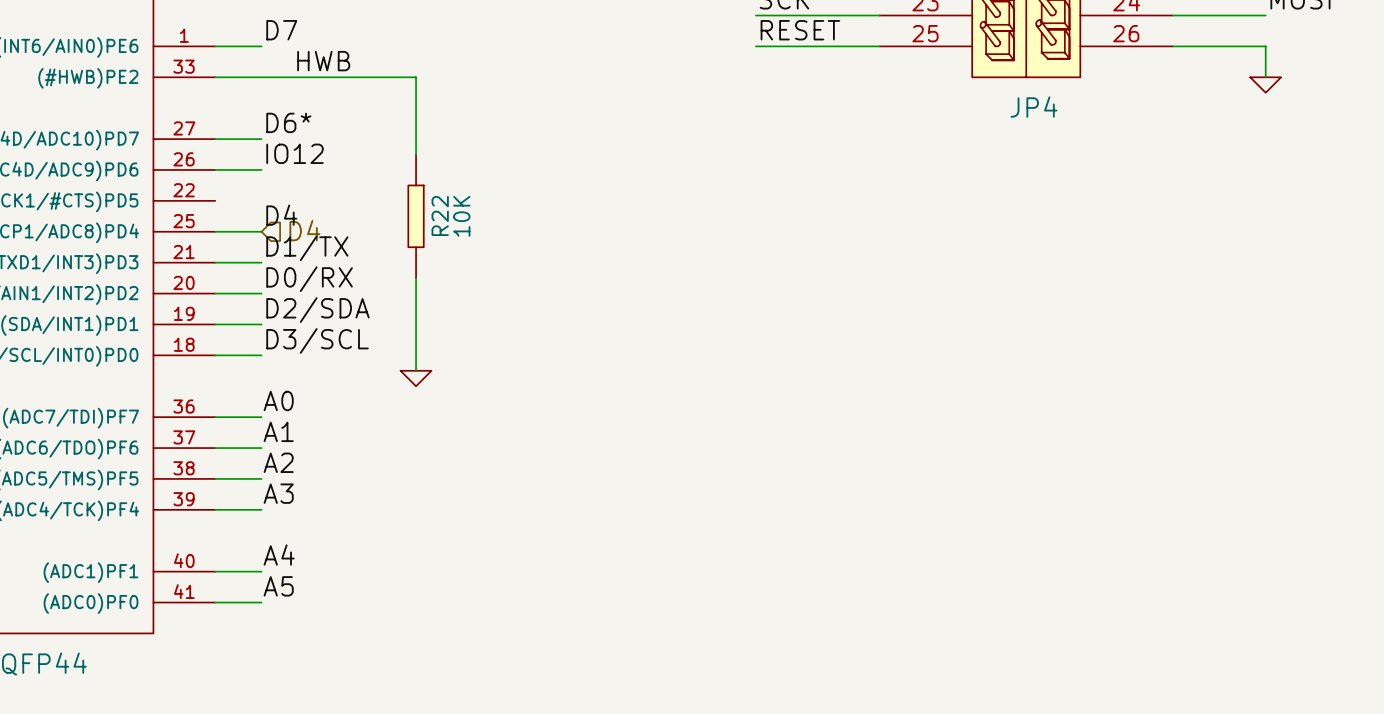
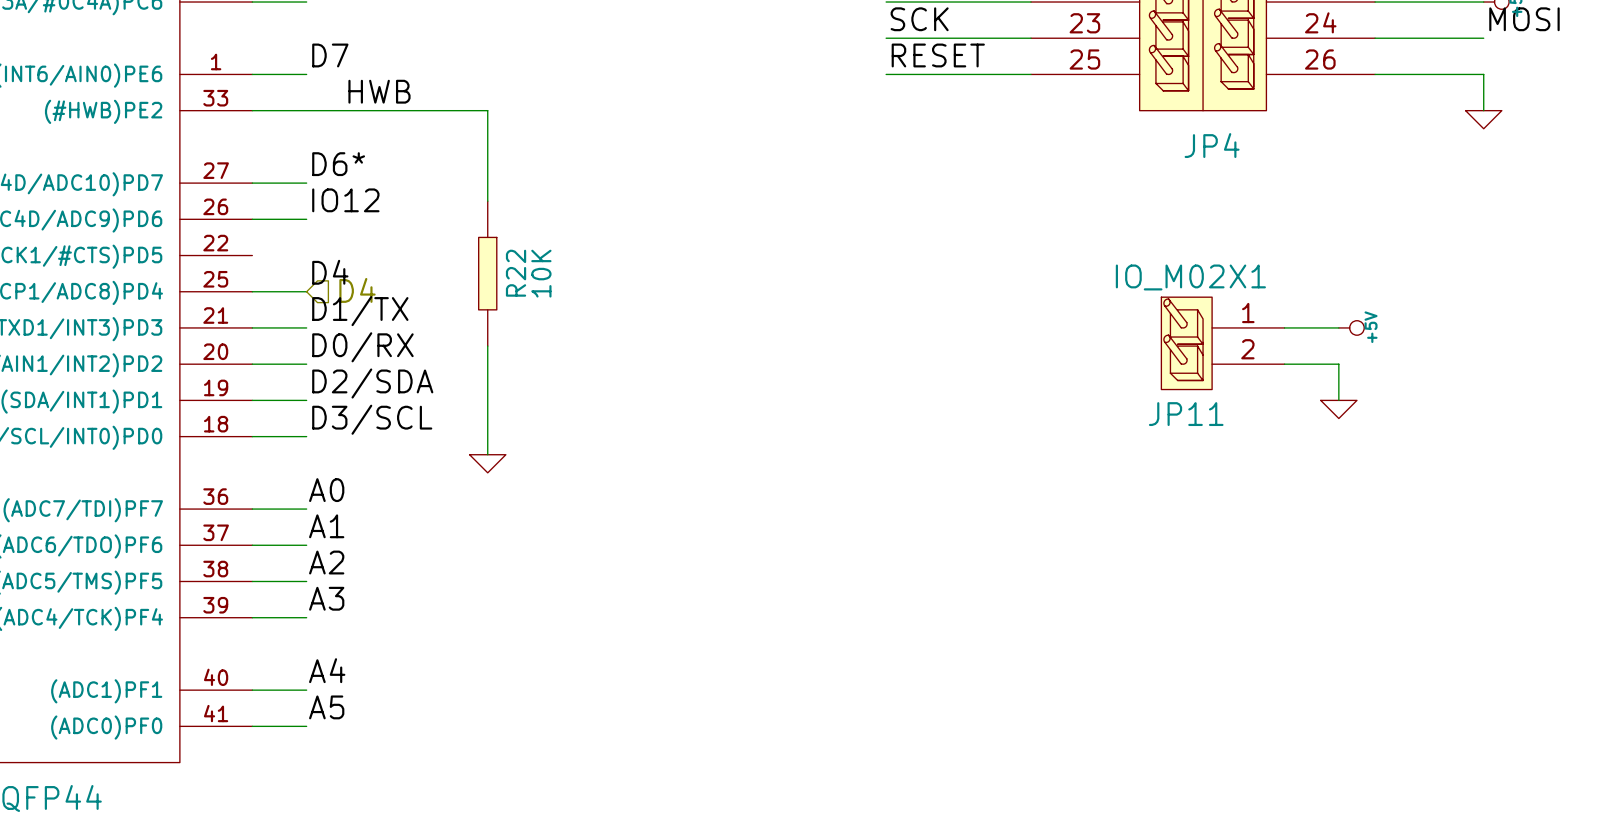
wire: none -> (1284, 327) (1338, 327)
power symbol: none -> +5V (1351, 327)
JP11: none -> IO_M02X1 (1222, 343)
wire: none -> (1284, 364) (1338, 364) (1338, 400)
power symbol: none -> (1338, 409)

